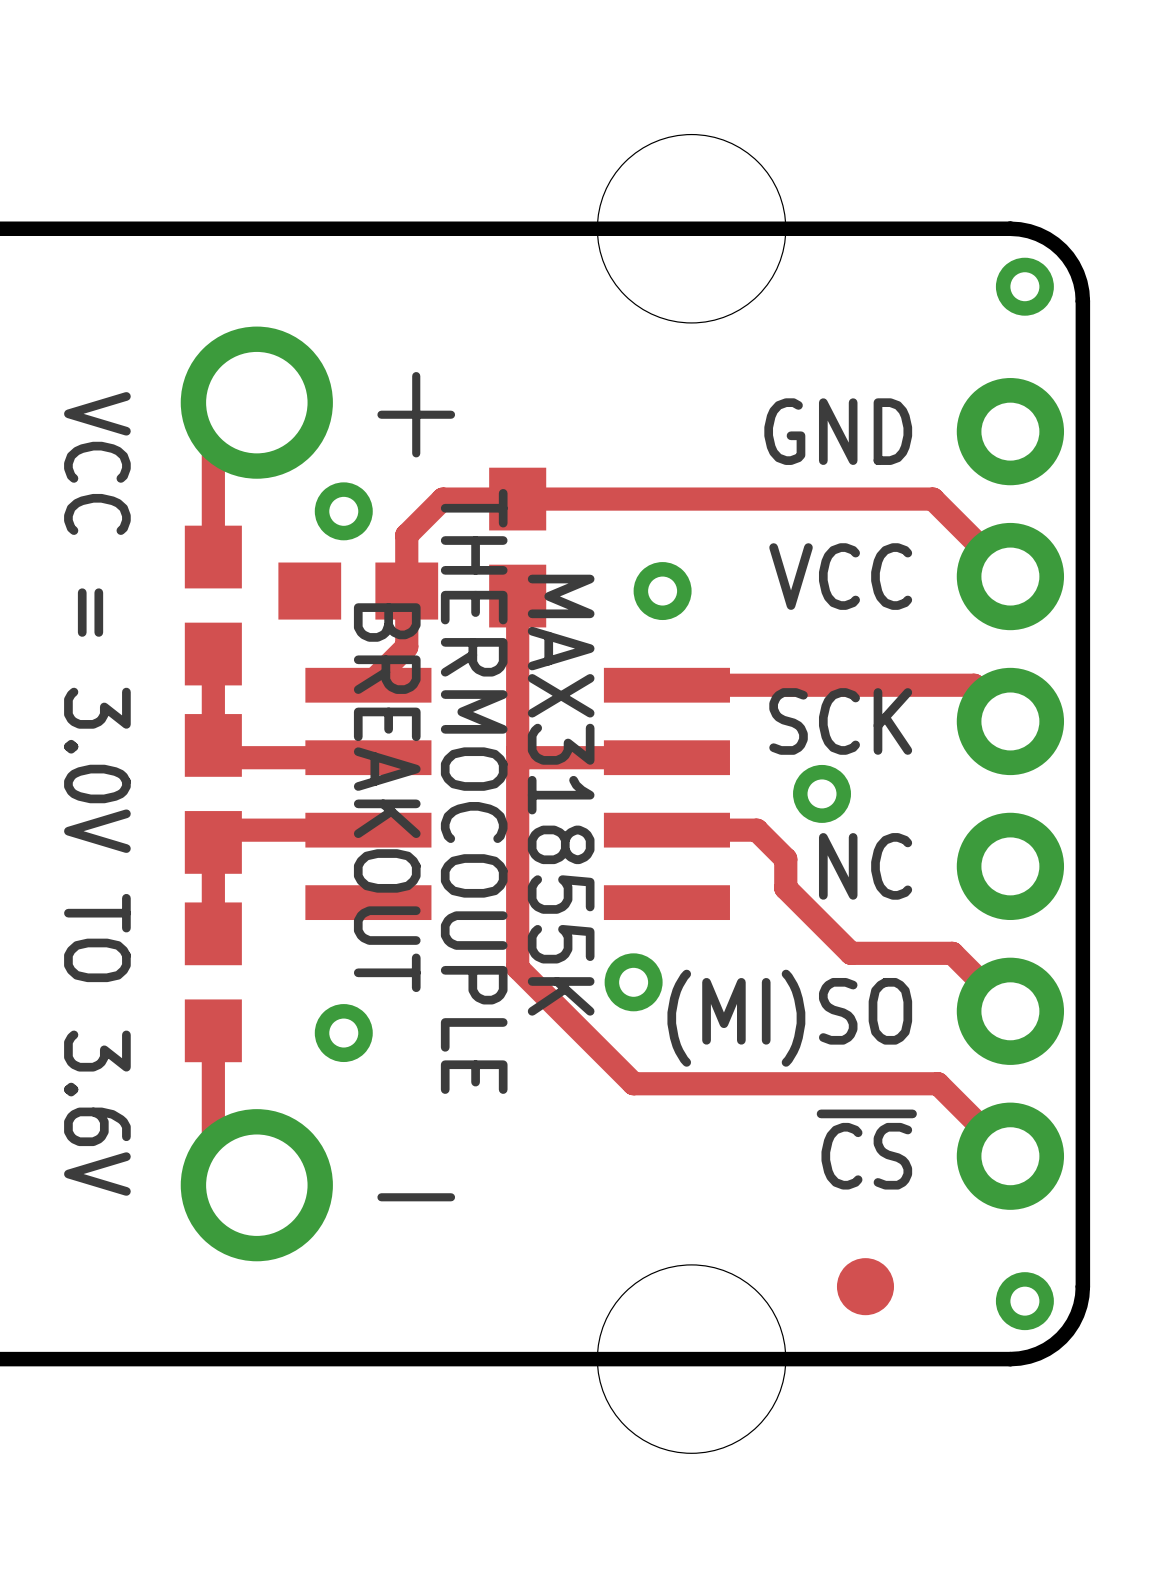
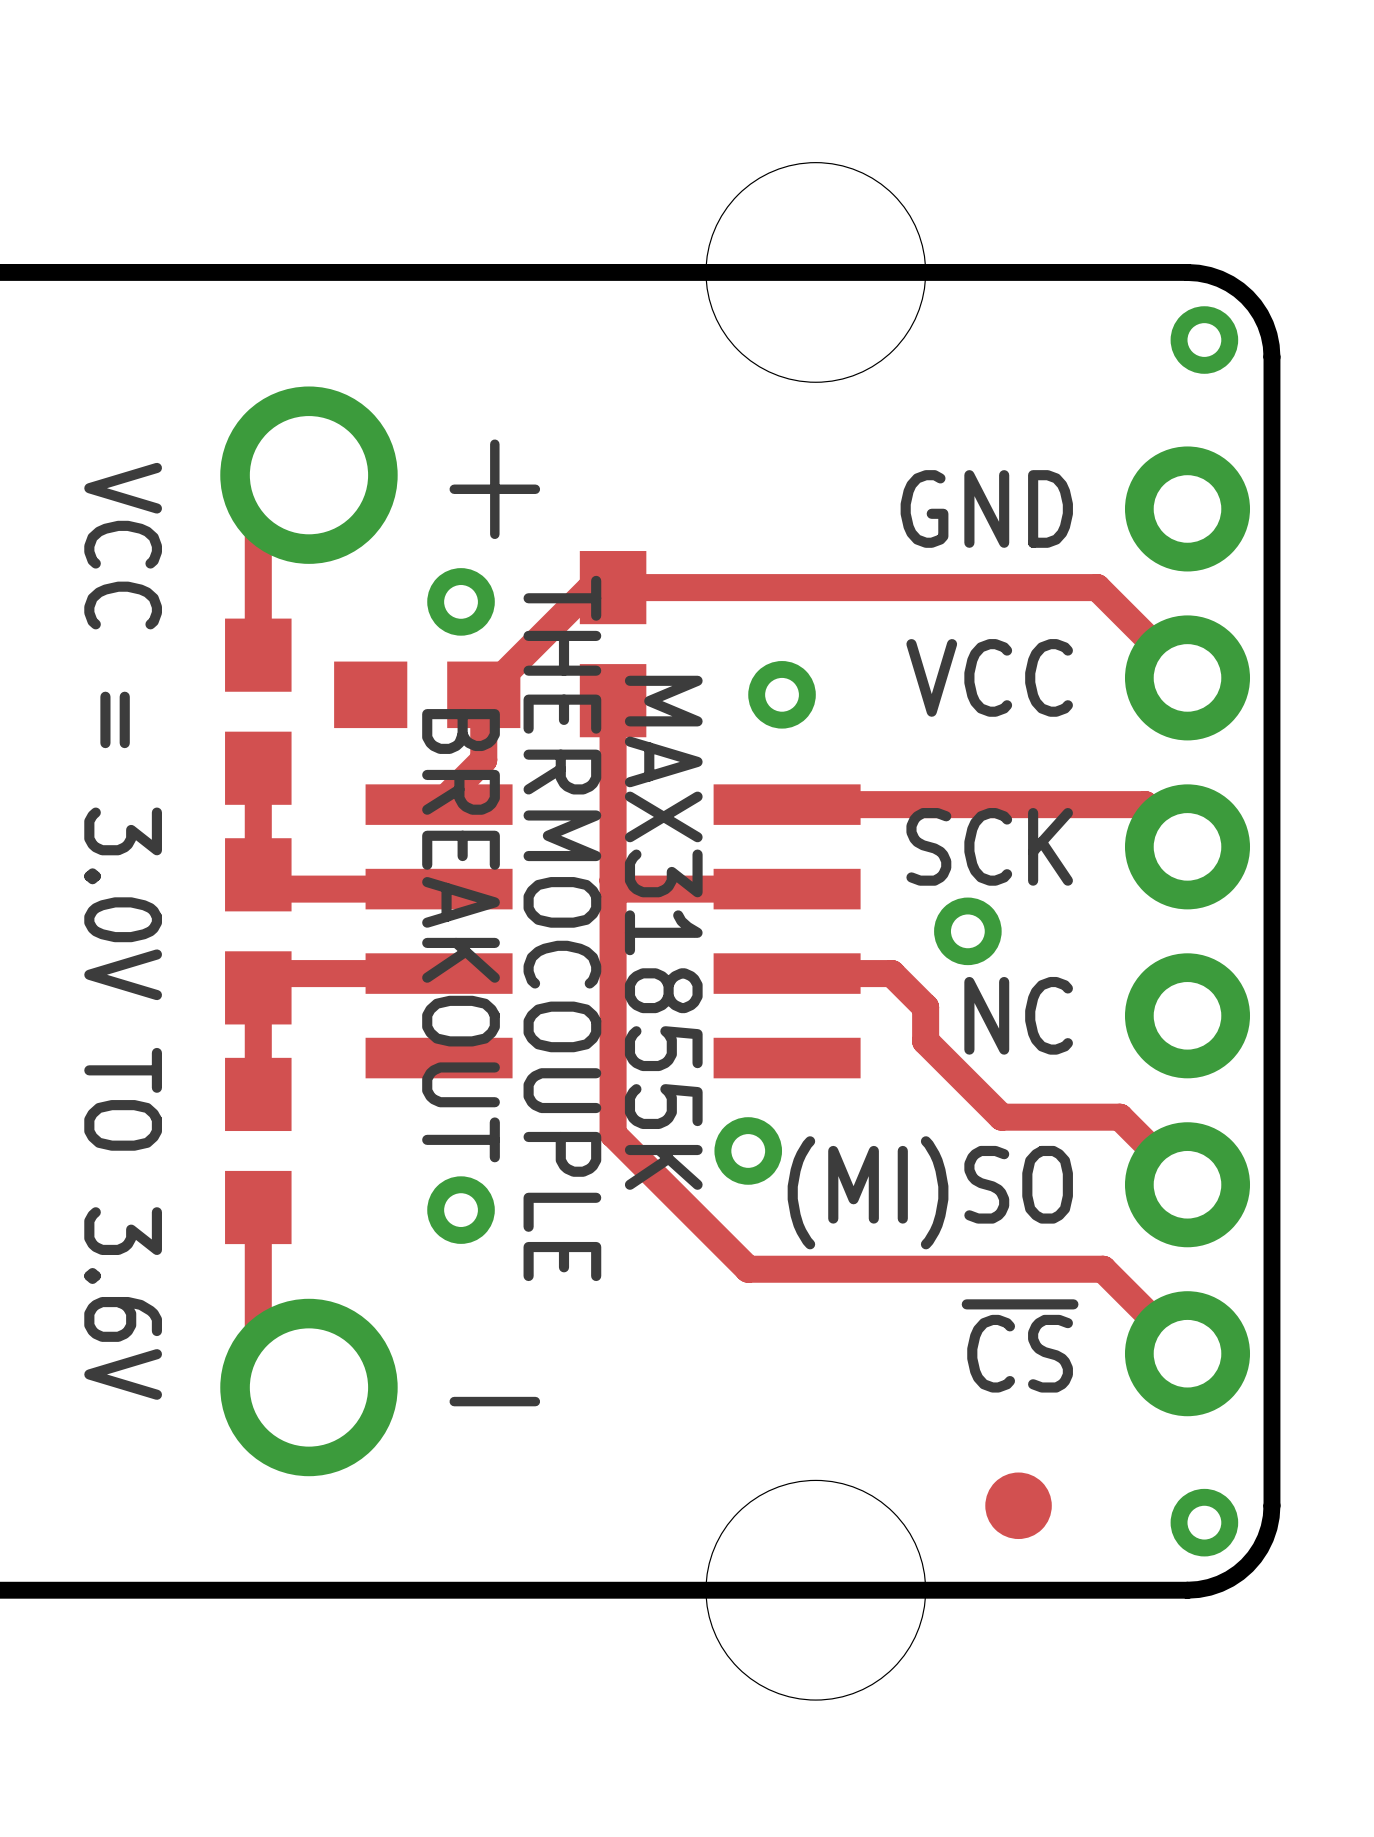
top track: (498, 499) (442, 499) (406, 535) (406, 591) -> (590, 587) (483, 694)
via position: (343, 511) -> (461, 601)
via position: (343, 1033) -> (461, 1210)

